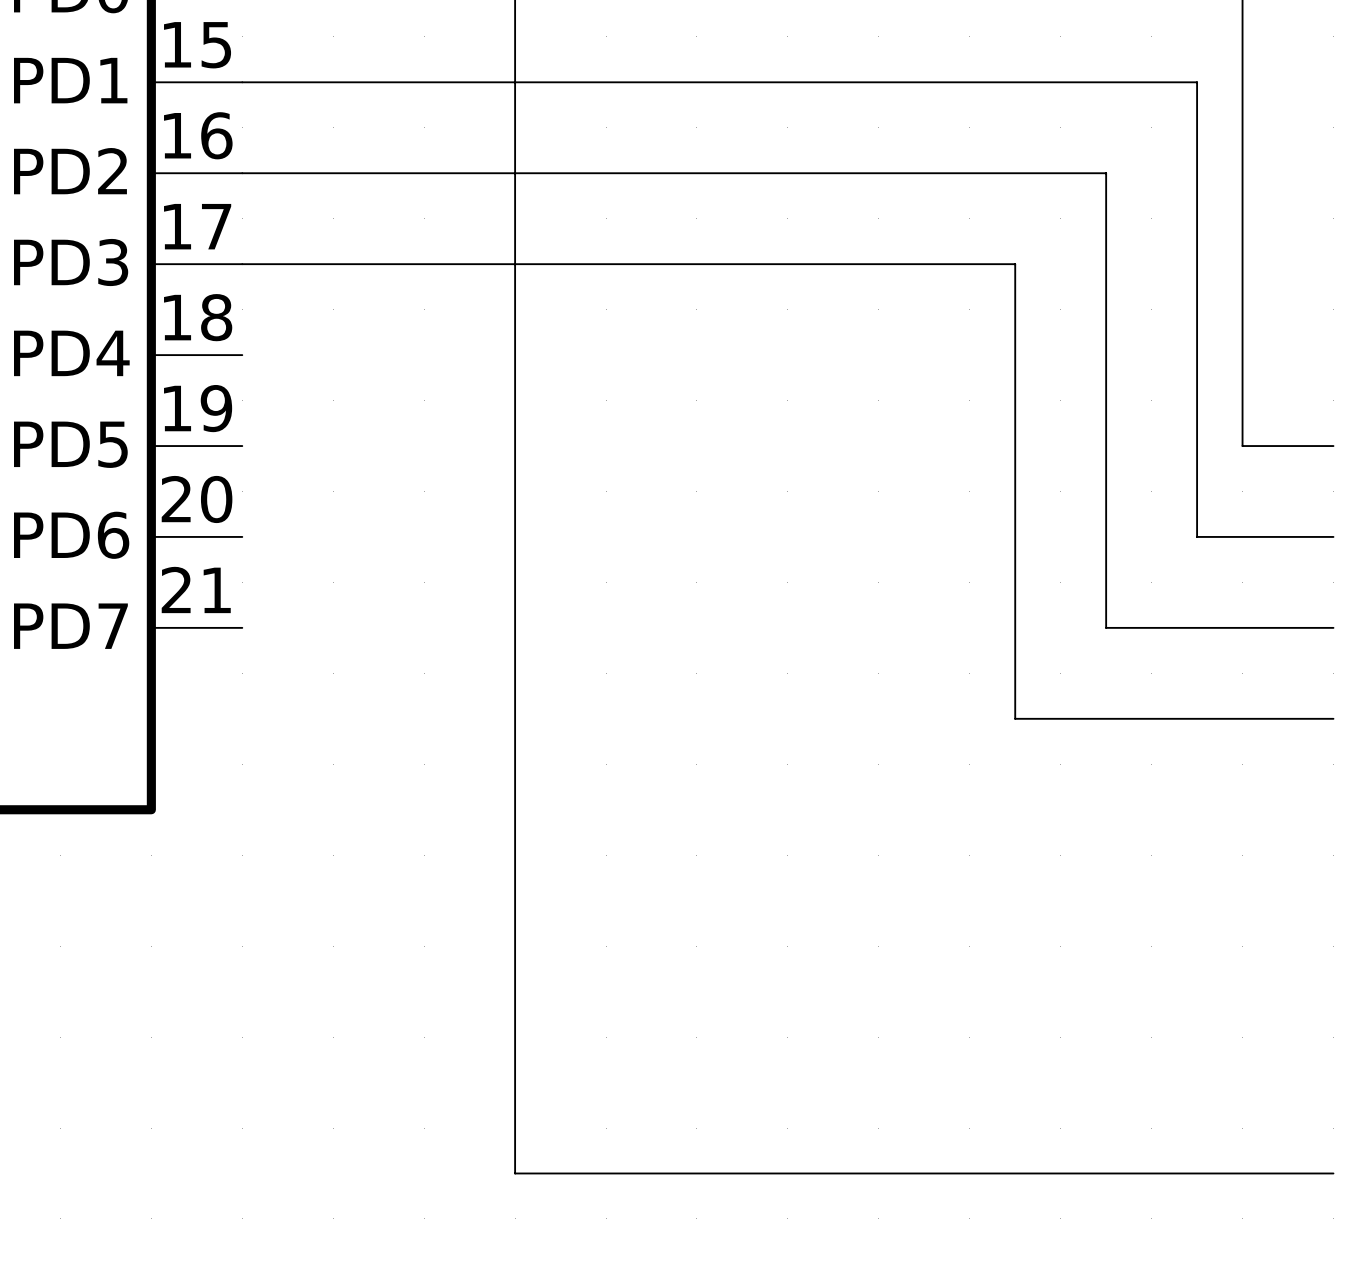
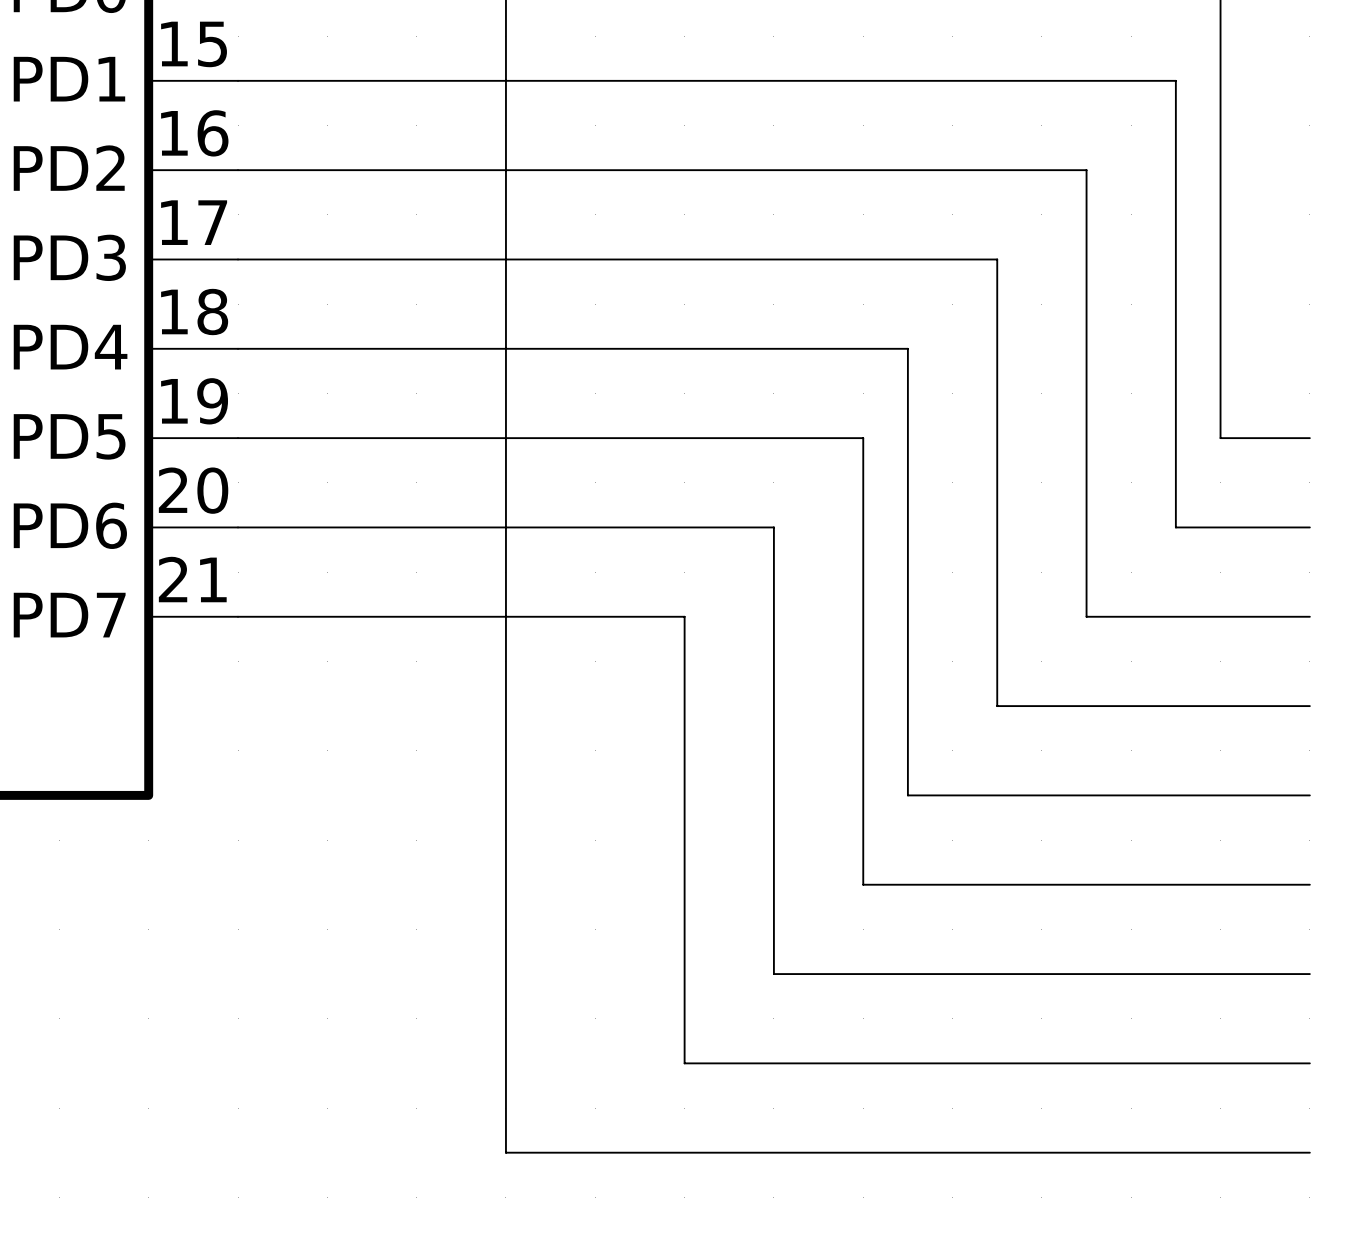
wire: none -> (238, 348) (907, 348) (907, 795) (1309, 795)
wire: none -> (238, 438) (863, 438) (863, 884) (1309, 884)
wire: none -> (238, 527) (773, 527) (773, 974) (1309, 974)
wire: none -> (238, 616) (684, 616) (684, 1063) (1309, 1063)

